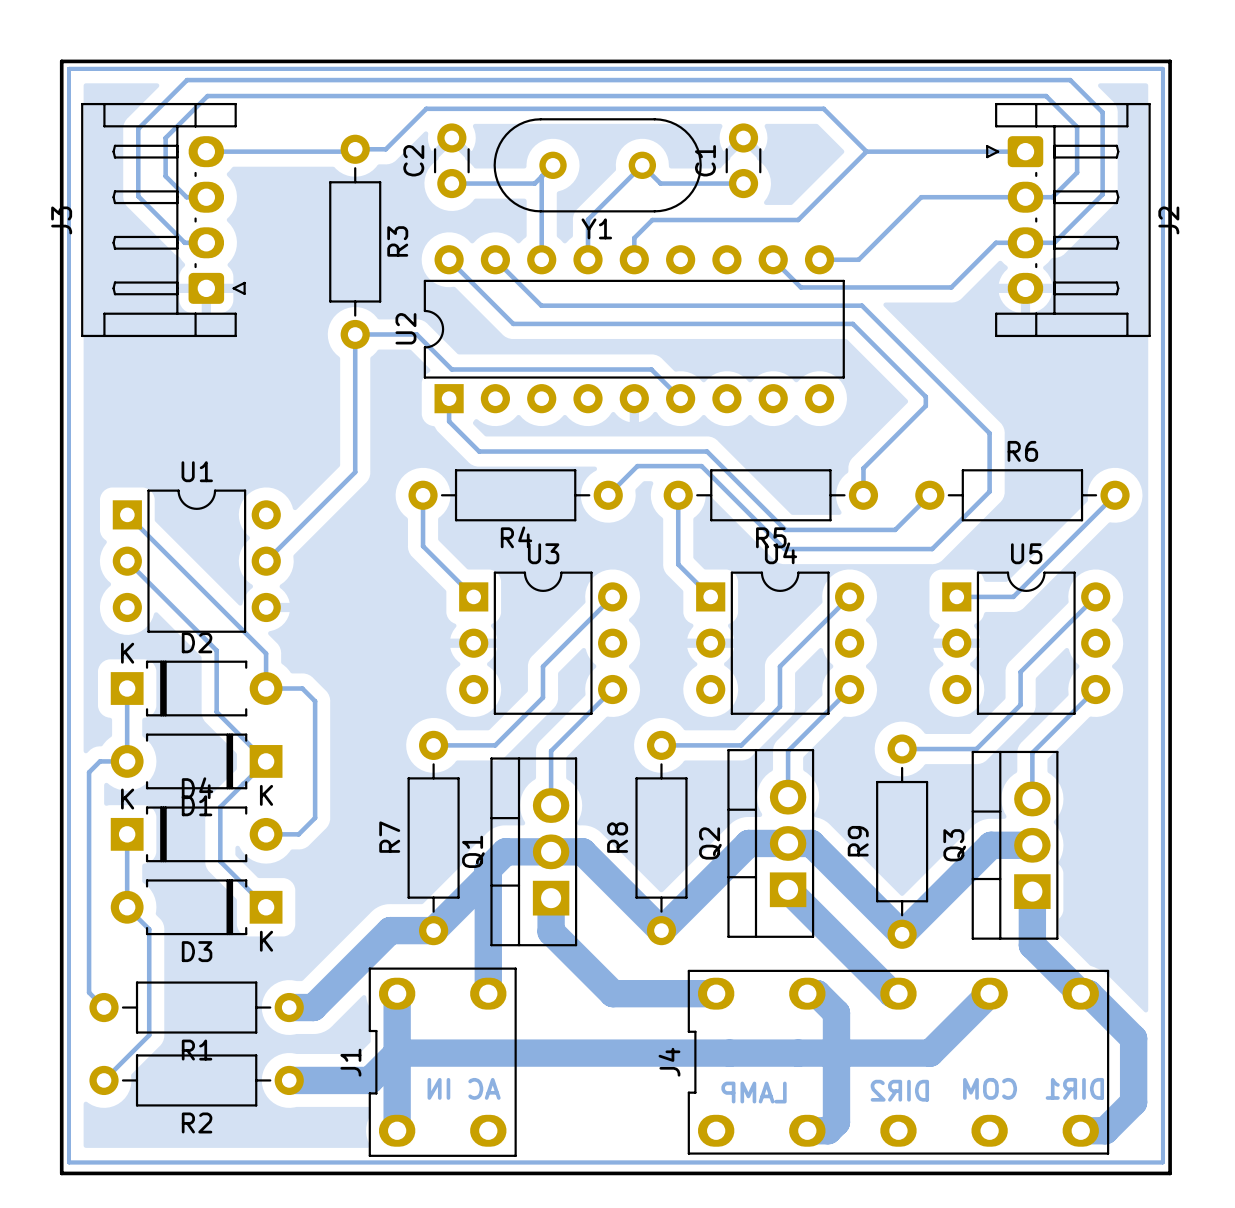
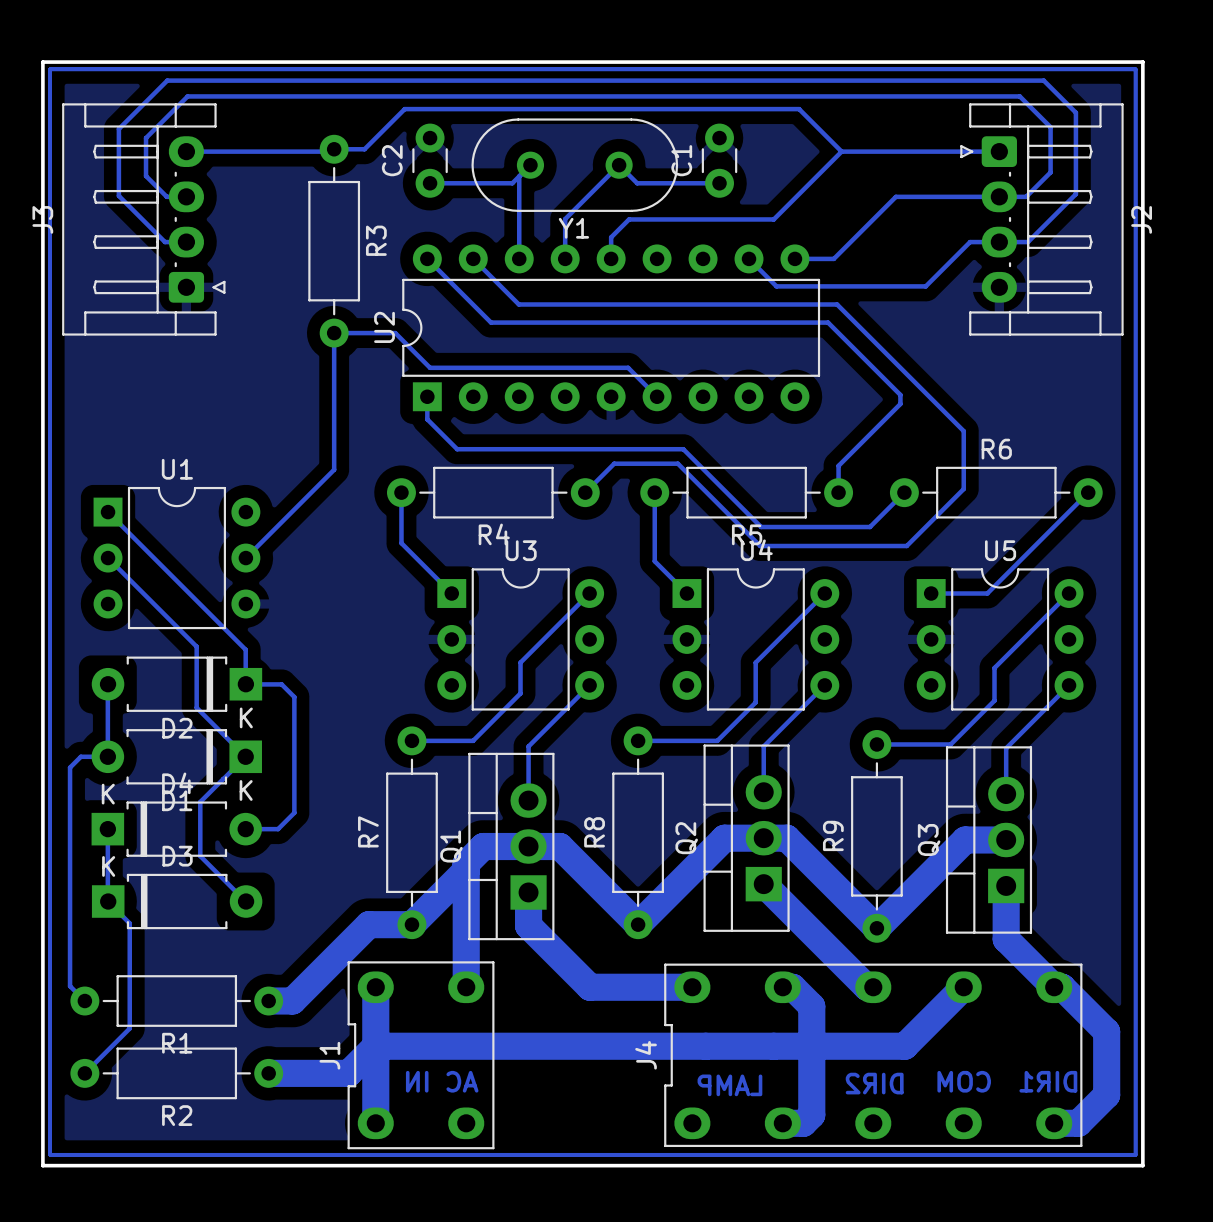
D2 rotation: 0° (196, 688) -> 180° (176, 684)
D3 rotation: 0° (196, 907) -> 180° (177, 901)

